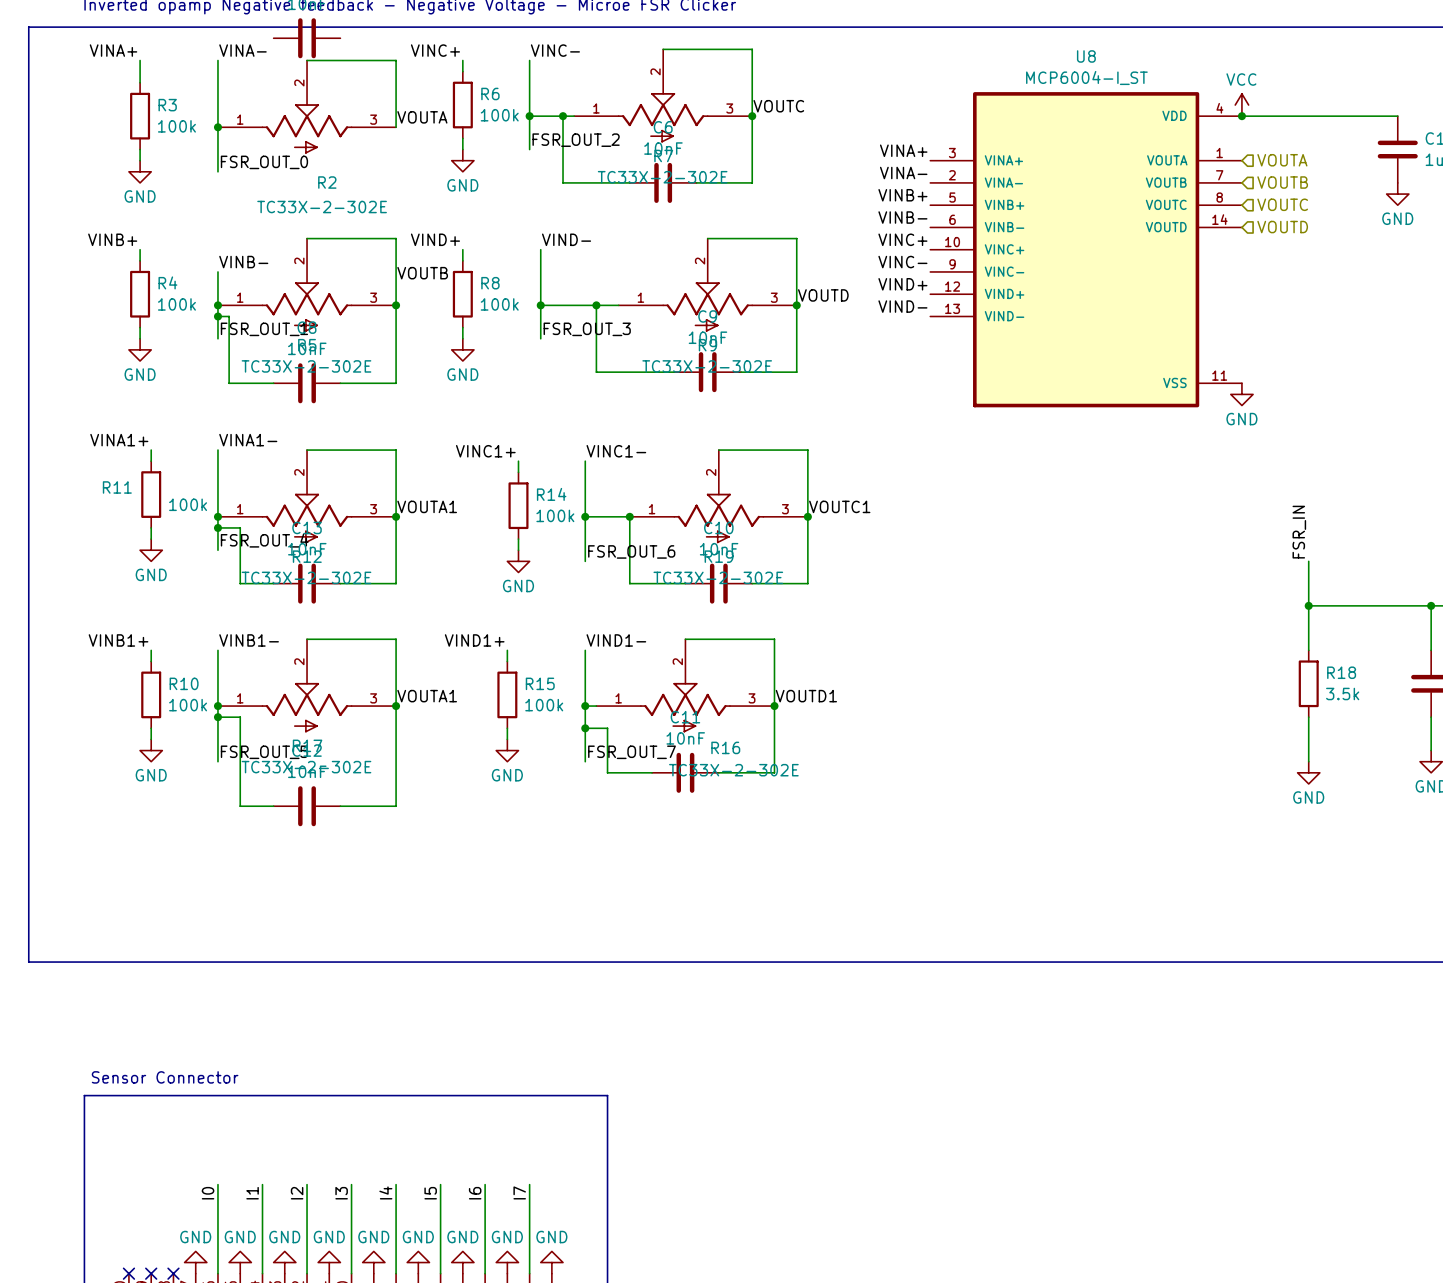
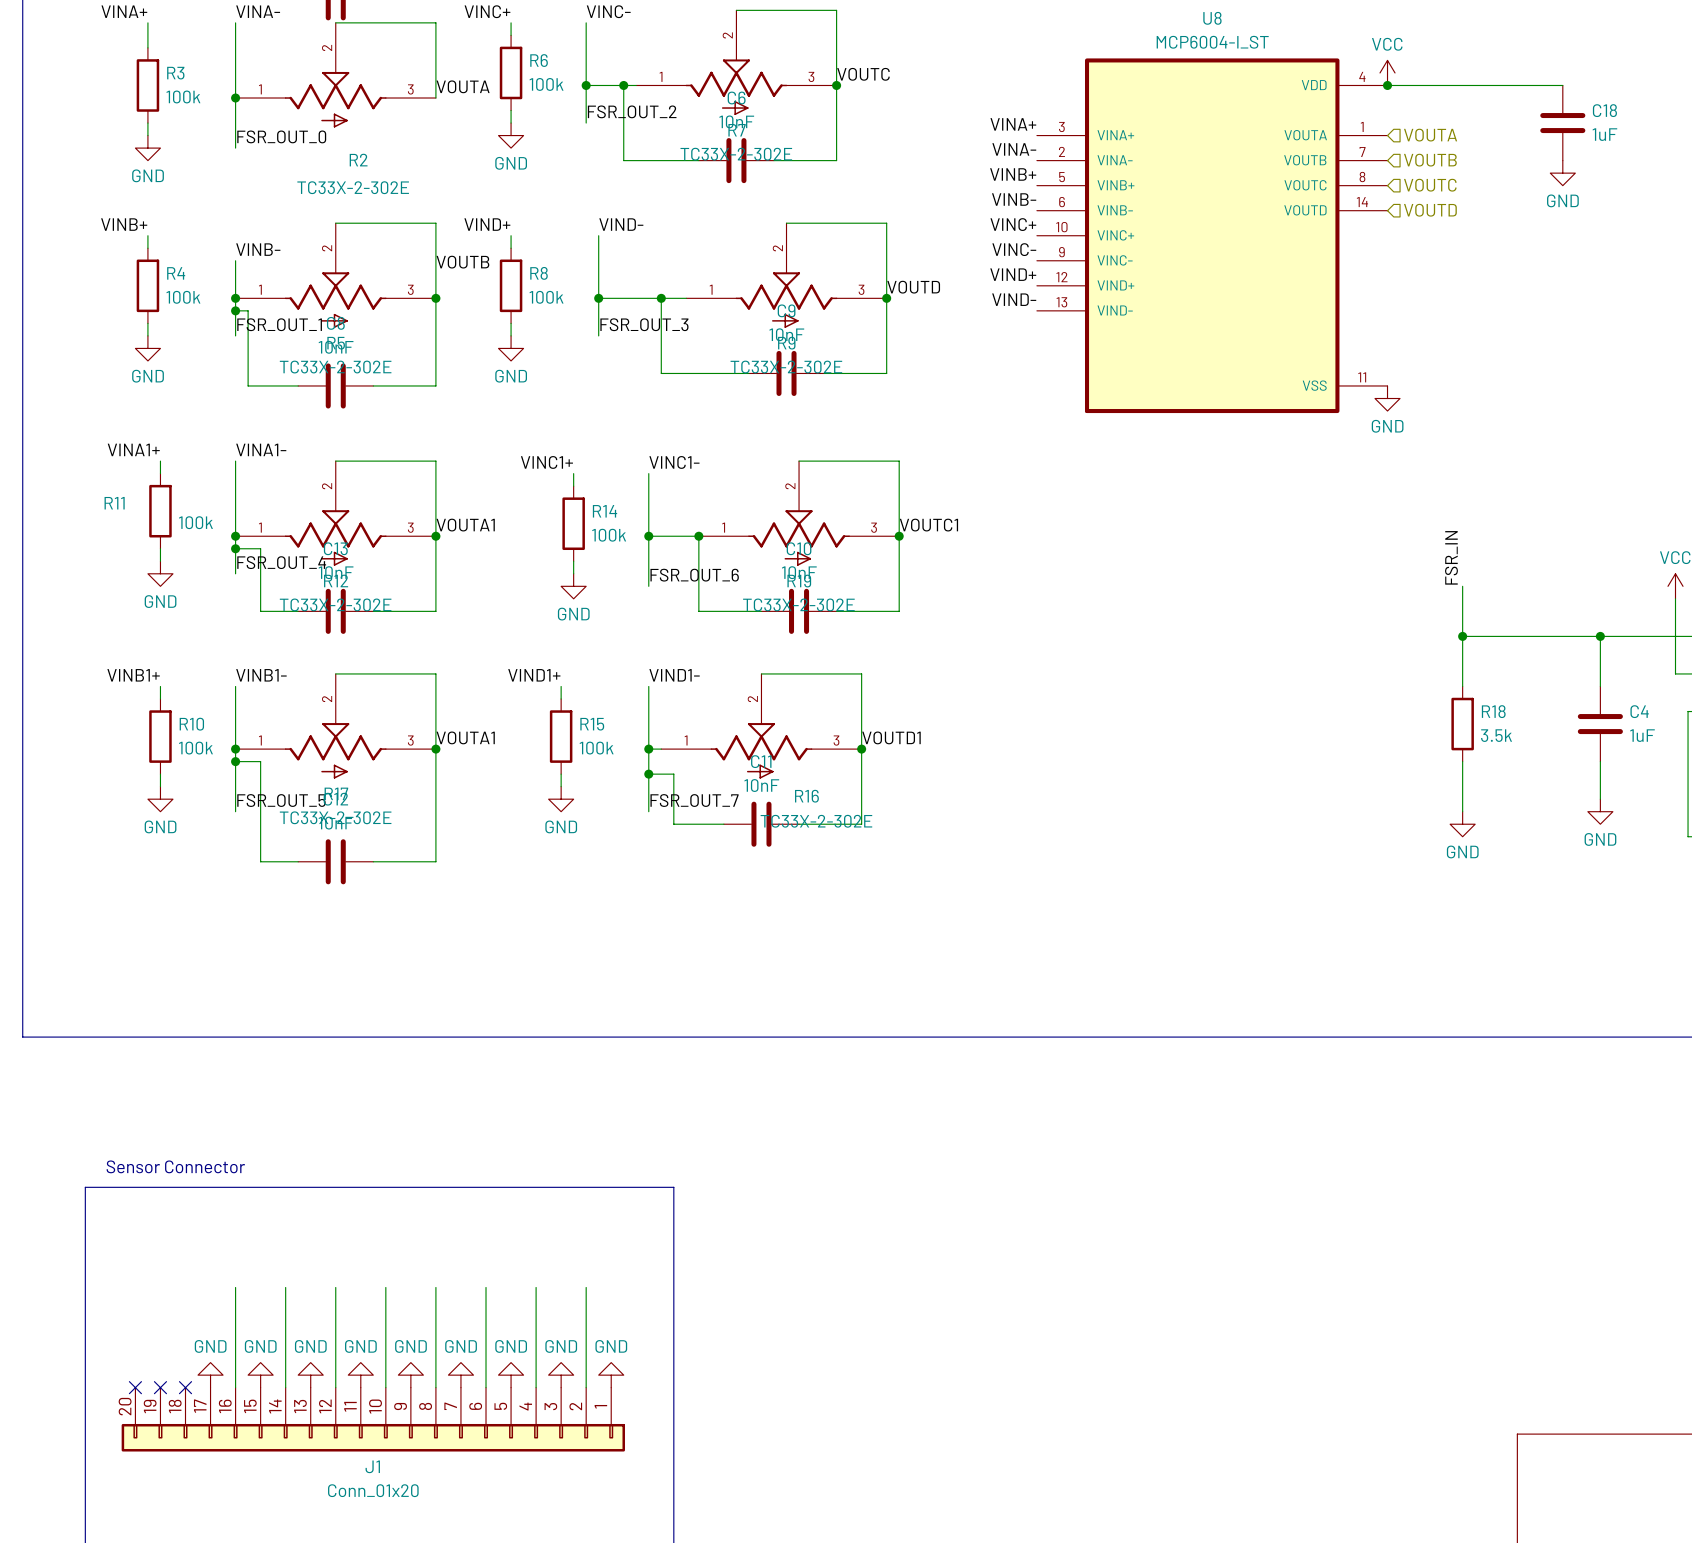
label: I4 (385, 1192) -> none
label: I7 (519, 1192) -> none
label: I0 (208, 1193) -> none
label: I1 (252, 1193) -> none
label: I2 (297, 1193) -> none
label: I3 (341, 1193) -> none
label: I5 (430, 1193) -> none
label: I6 (475, 1193) -> none

